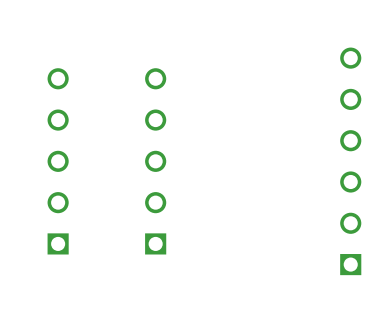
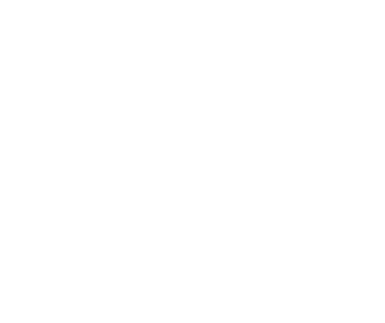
part: (58, 161) -> none
part: (155, 161) -> none
part: (350, 161) -> none

